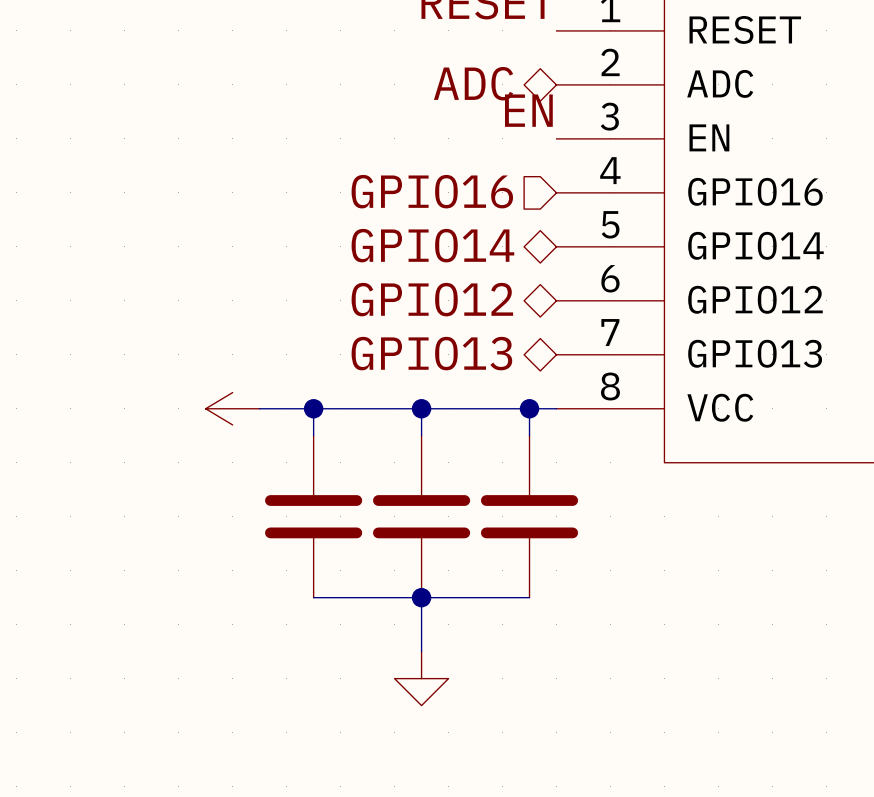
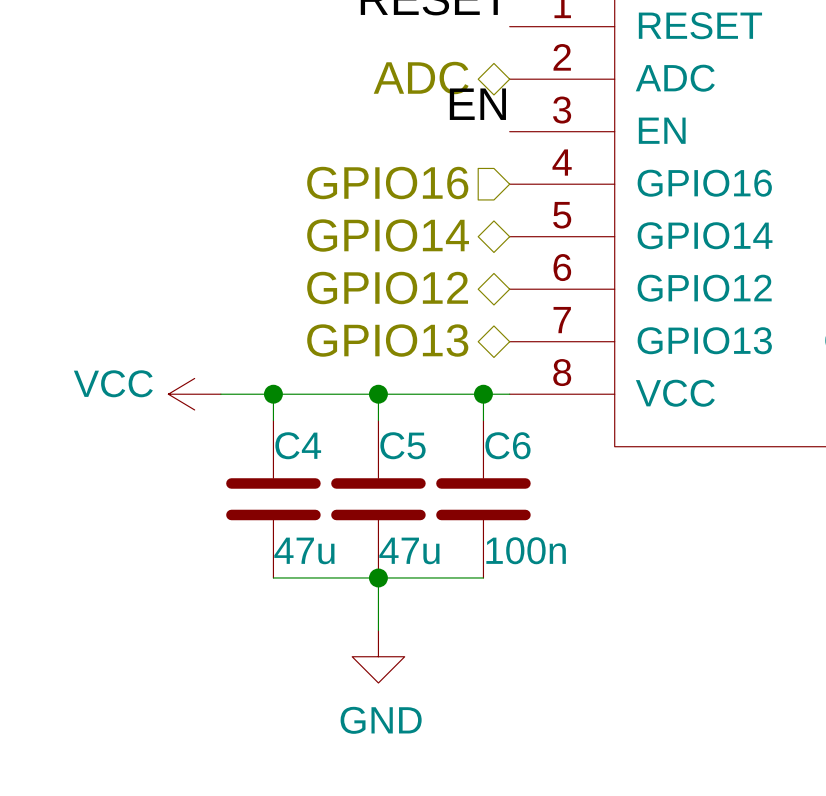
power symbol text: none -> VCC (113, 383)
C4 name: none -> C4 (298, 445)
C5 name: none -> C5 (403, 445)
C6 name: none -> C6 (507, 445)
C4 value: none -> 47u (304, 550)
C5 value: none -> 47u (409, 550)
C6 value: none -> 100n (526, 550)
power symbol text: none -> GND (381, 720)

